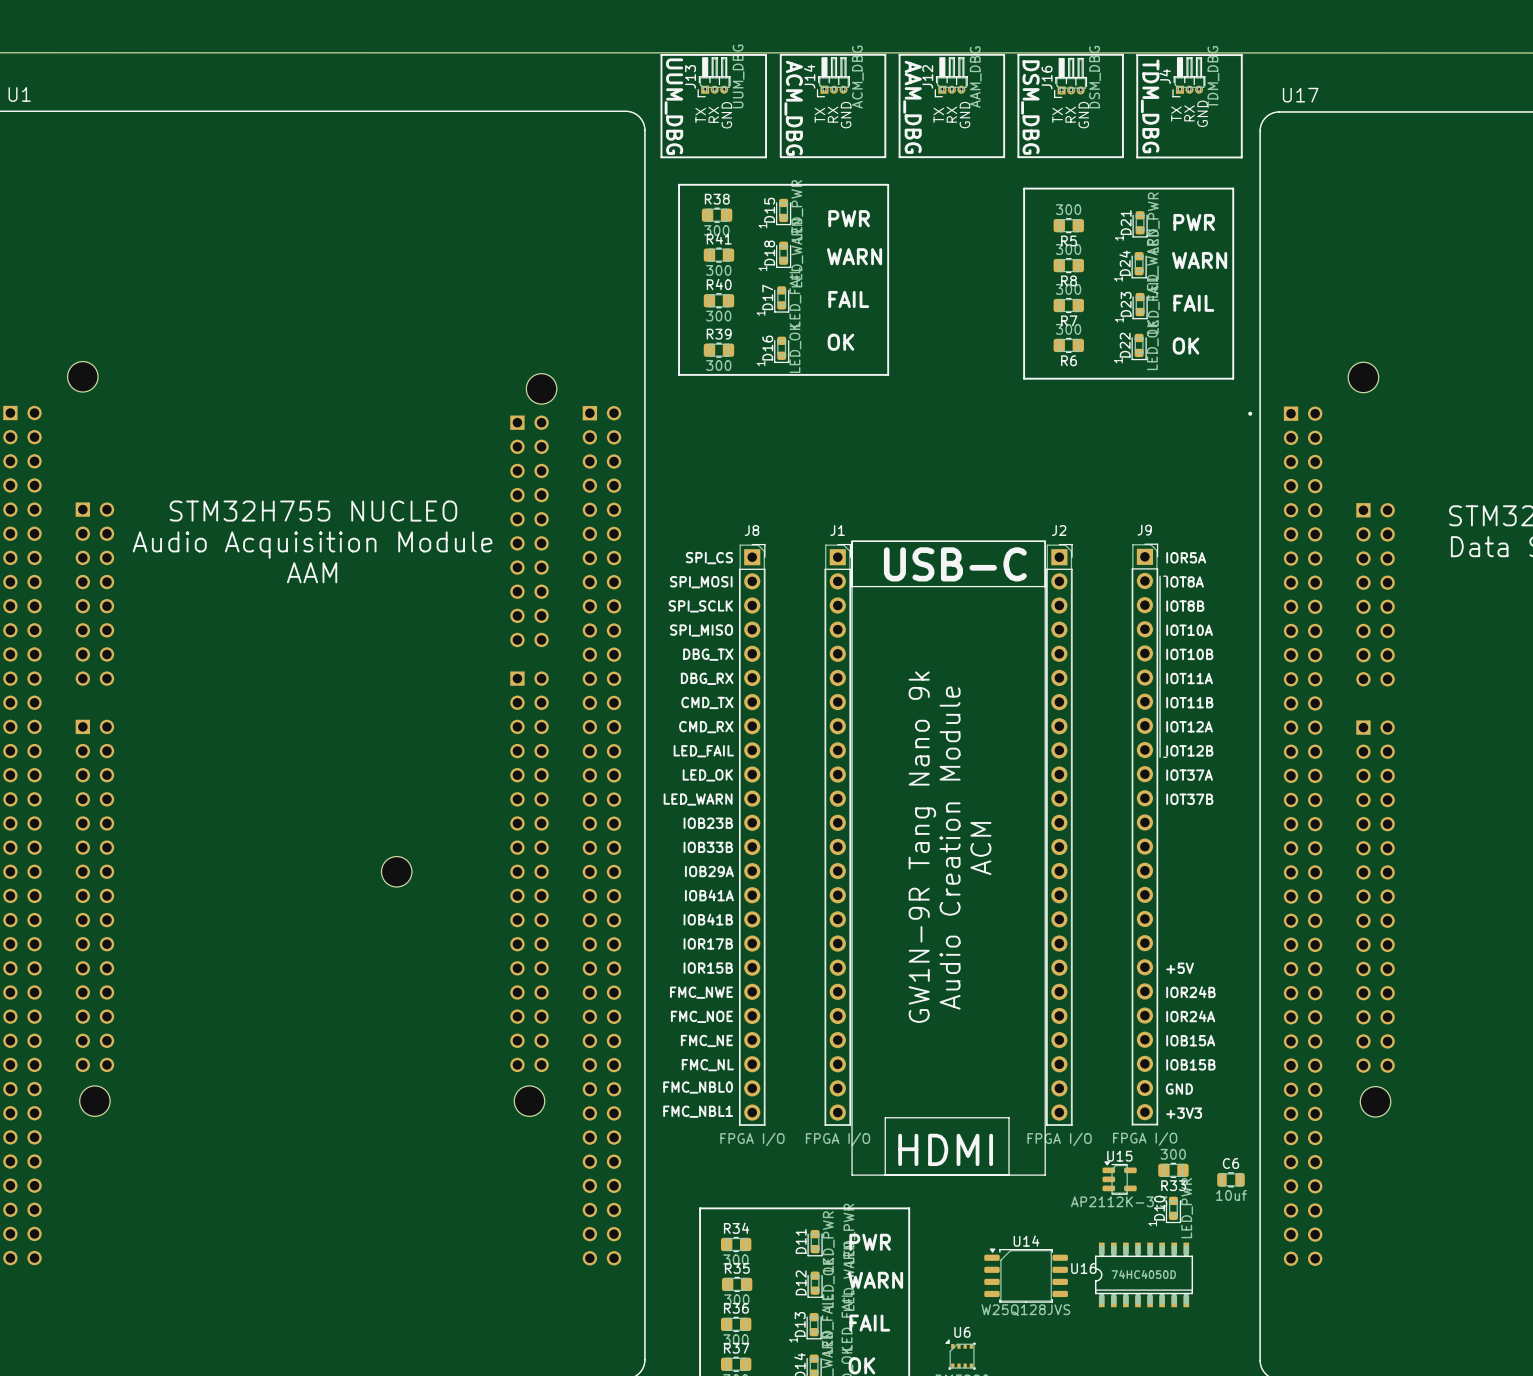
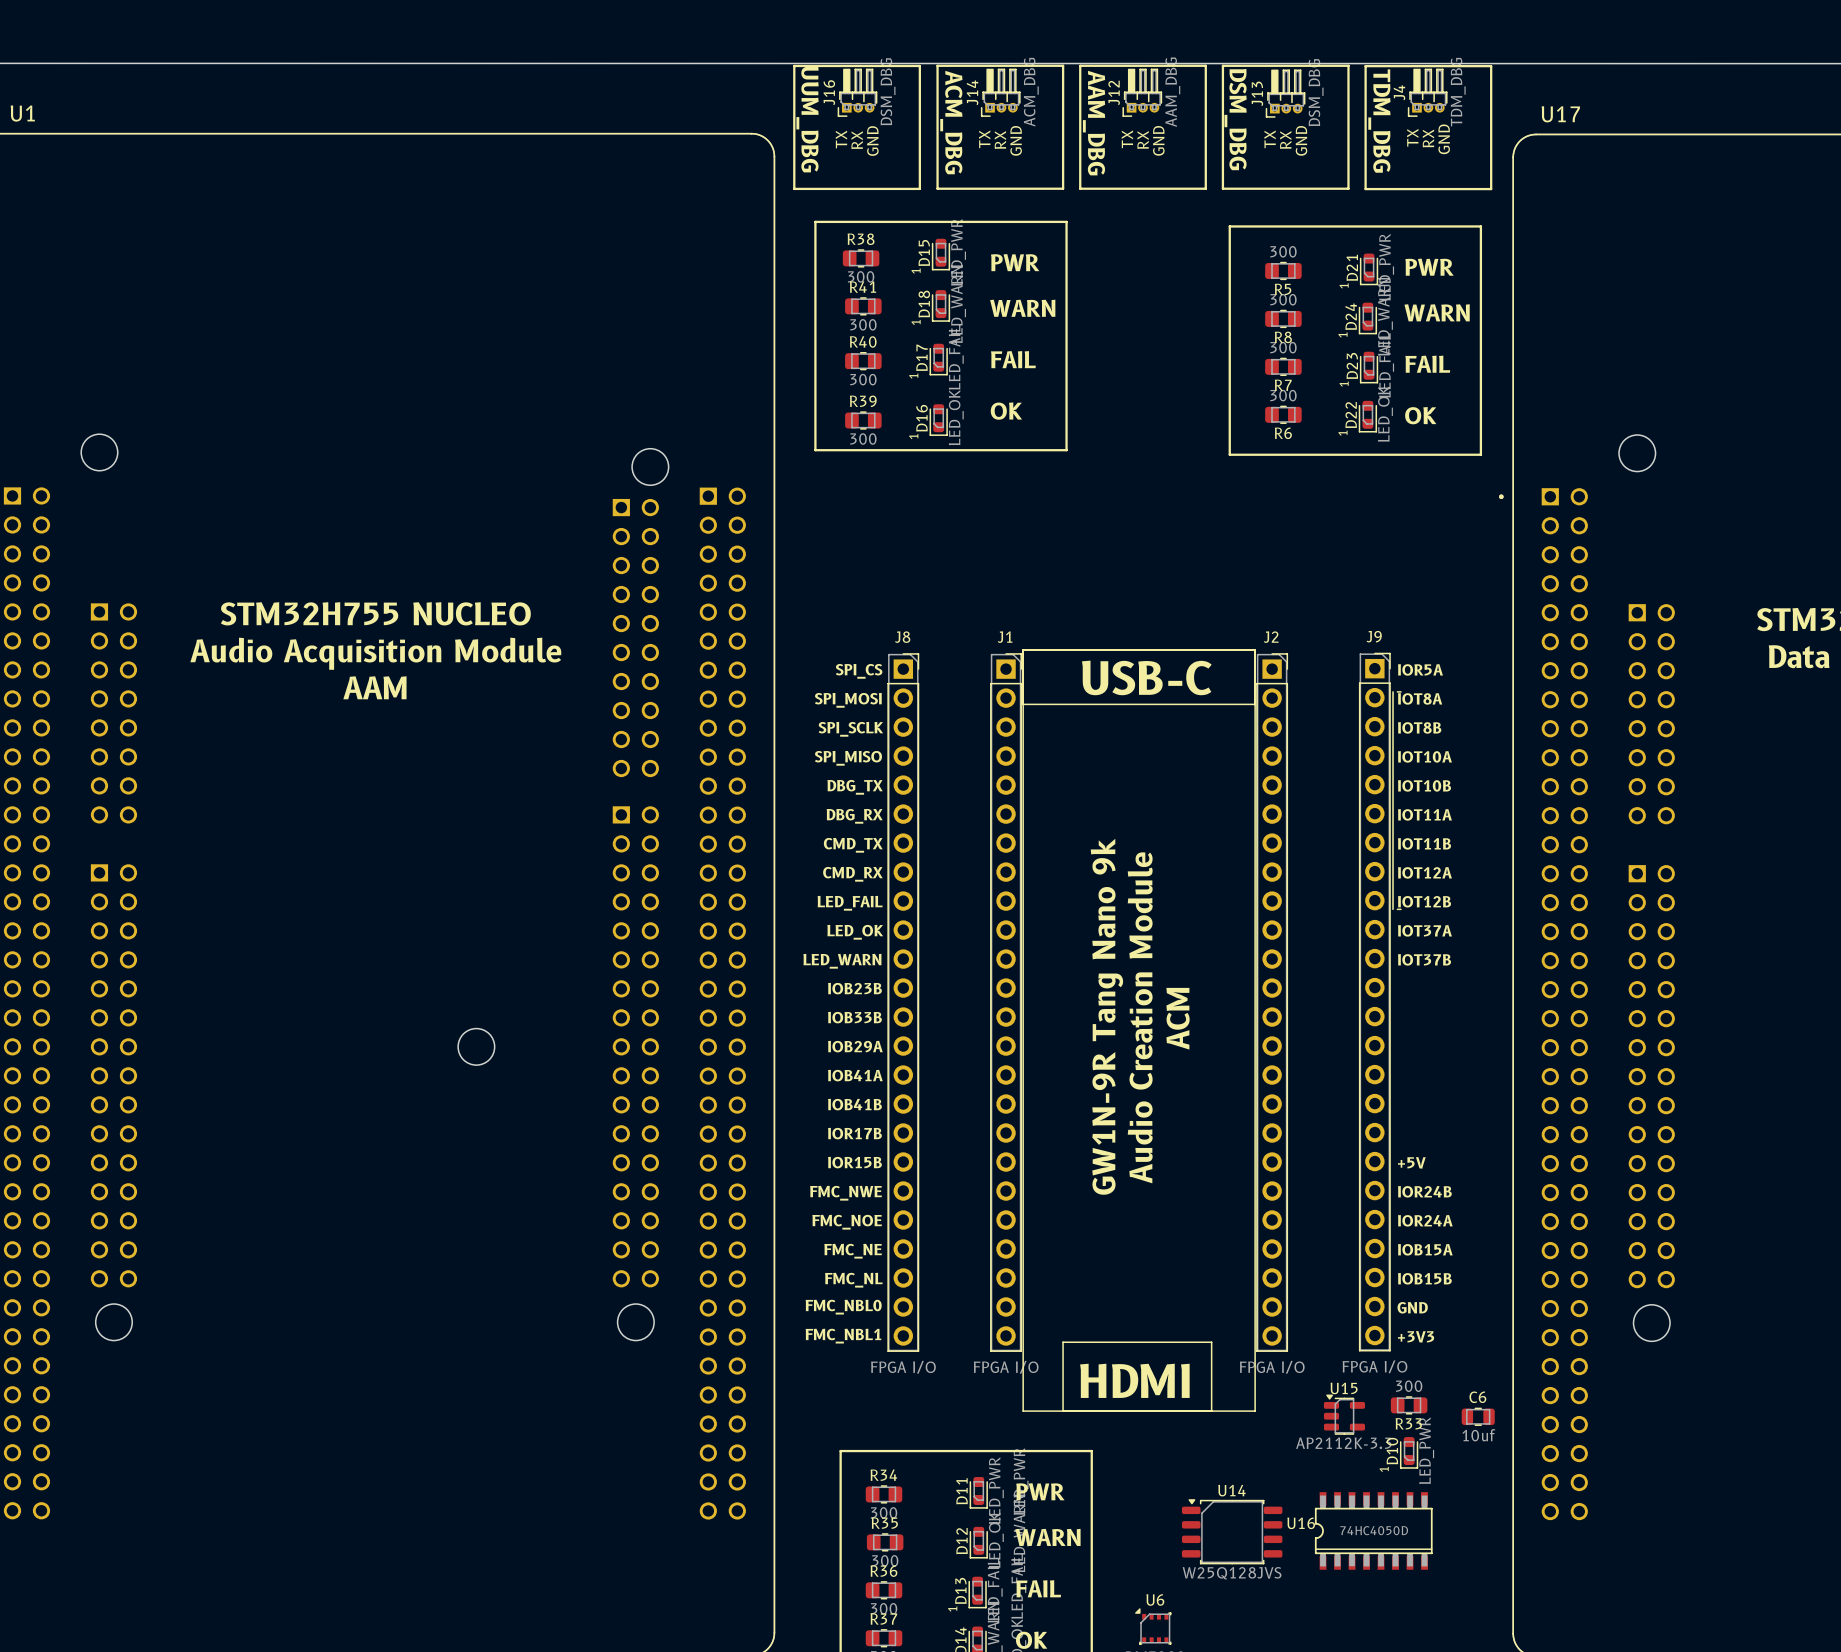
J13 name: J13 (690, 76) -> J16 (829, 92)
J13 value: UUM_DBG (738, 76) -> DSM_DBG (888, 91)
J16 name: J16 (1047, 77) -> J13 (1257, 93)

